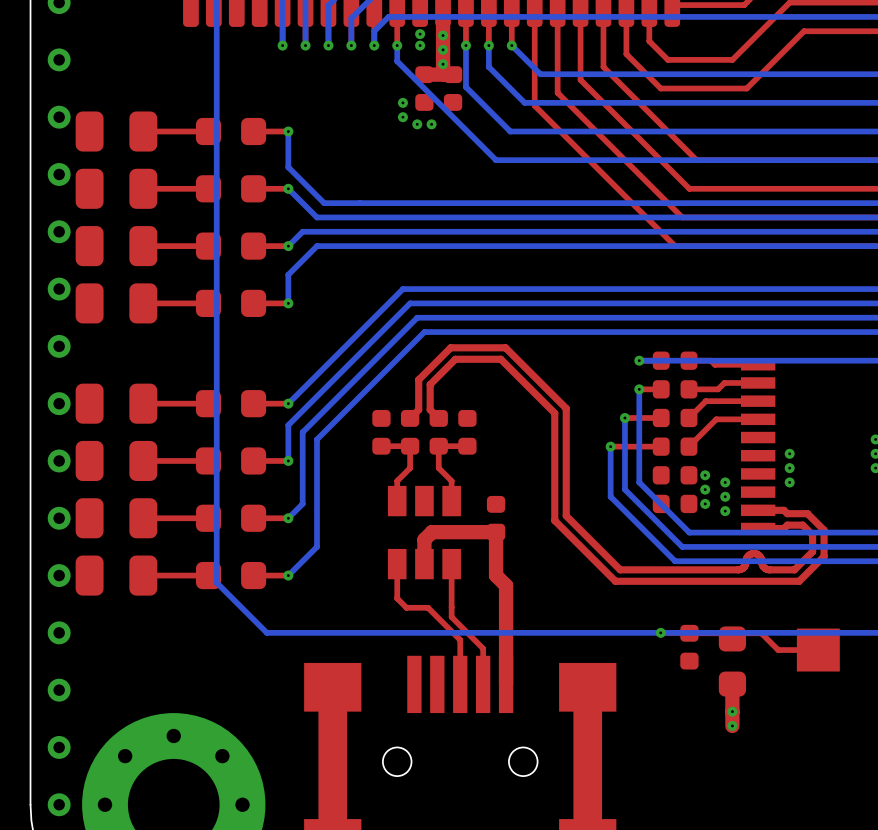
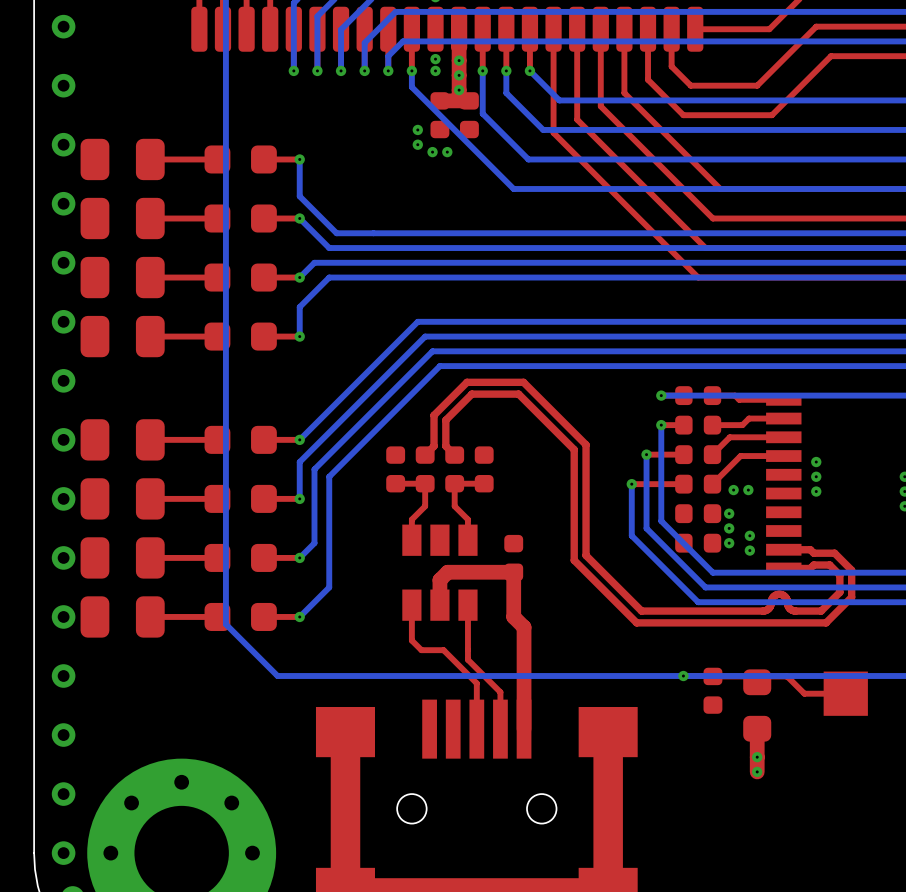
via: none -> (816, 462)
via: none -> (816, 476)
via: none -> (733, 490)
via: none -> (748, 490)
via: (789, 468) -> none
via: (725, 482) -> none
via: (789, 482) -> none

